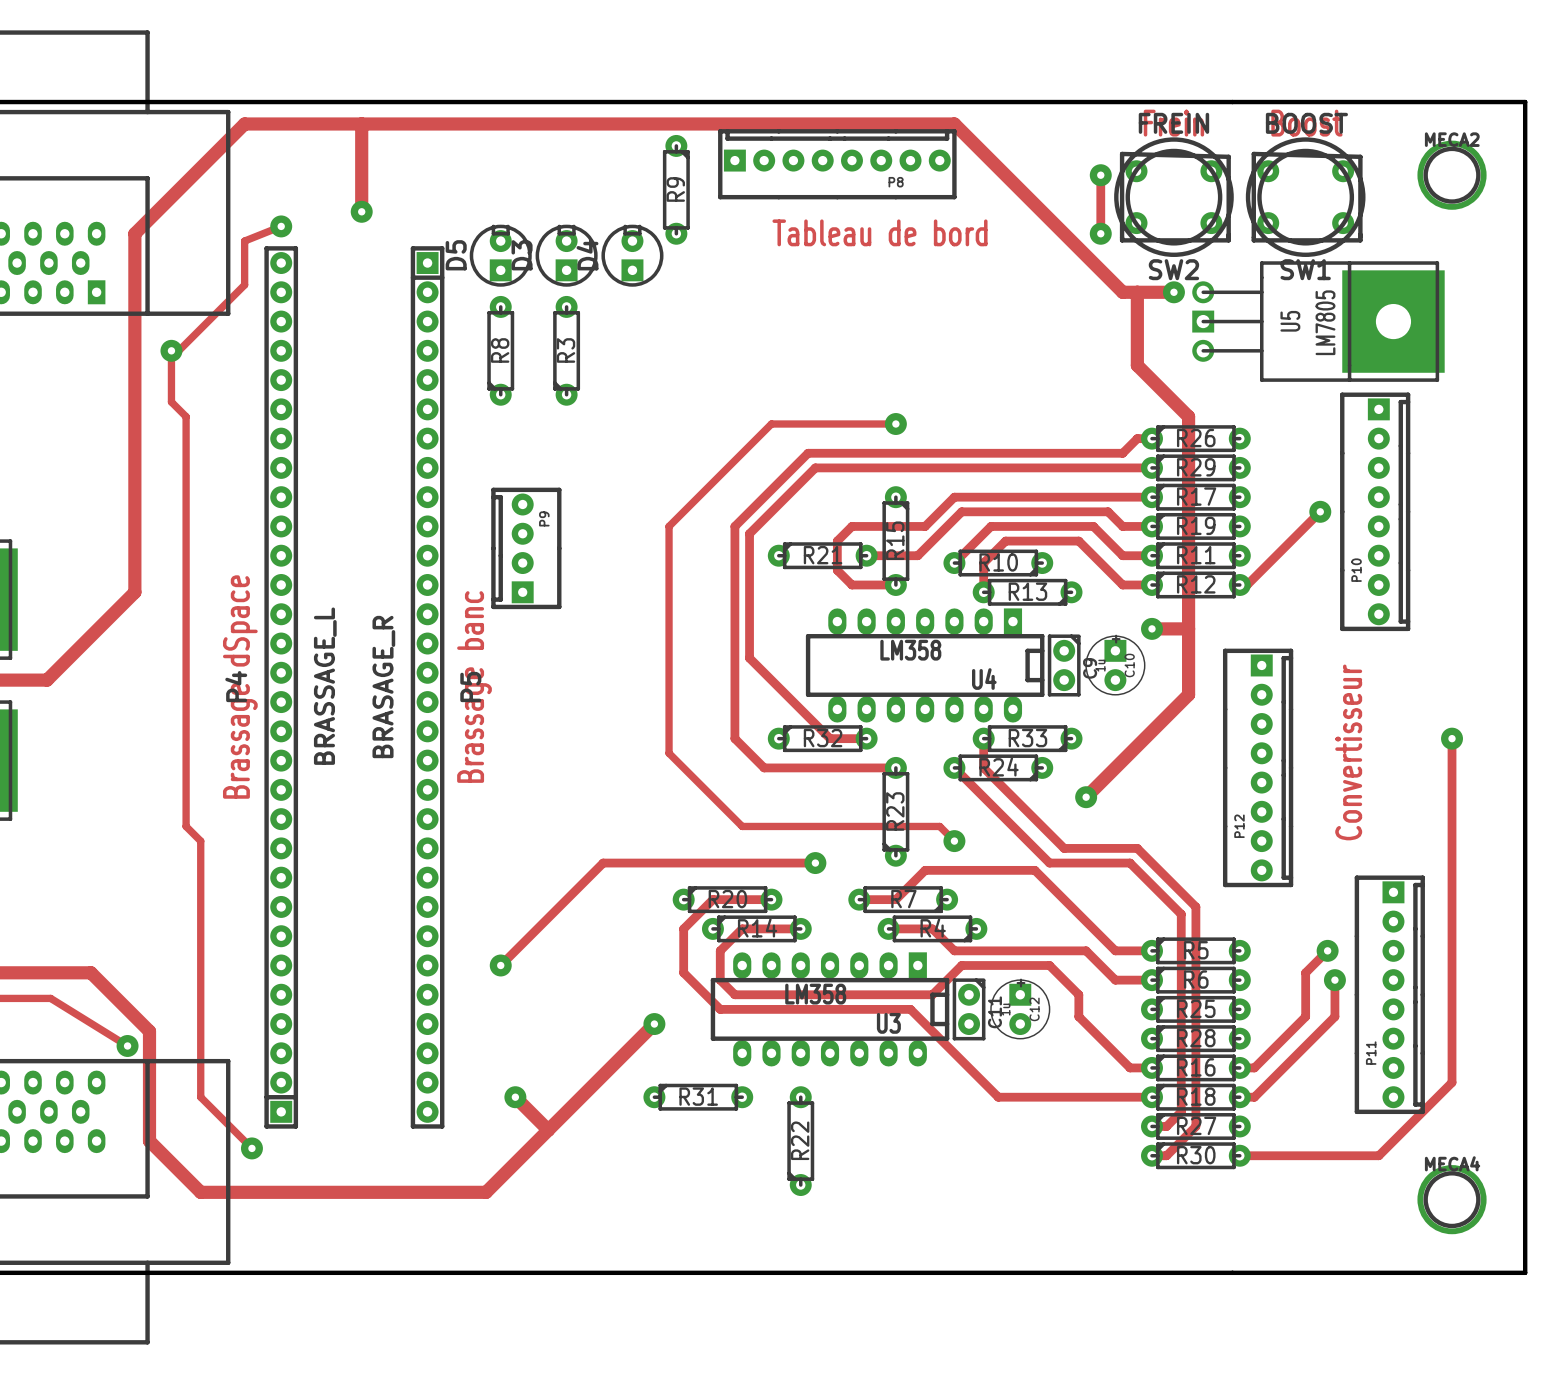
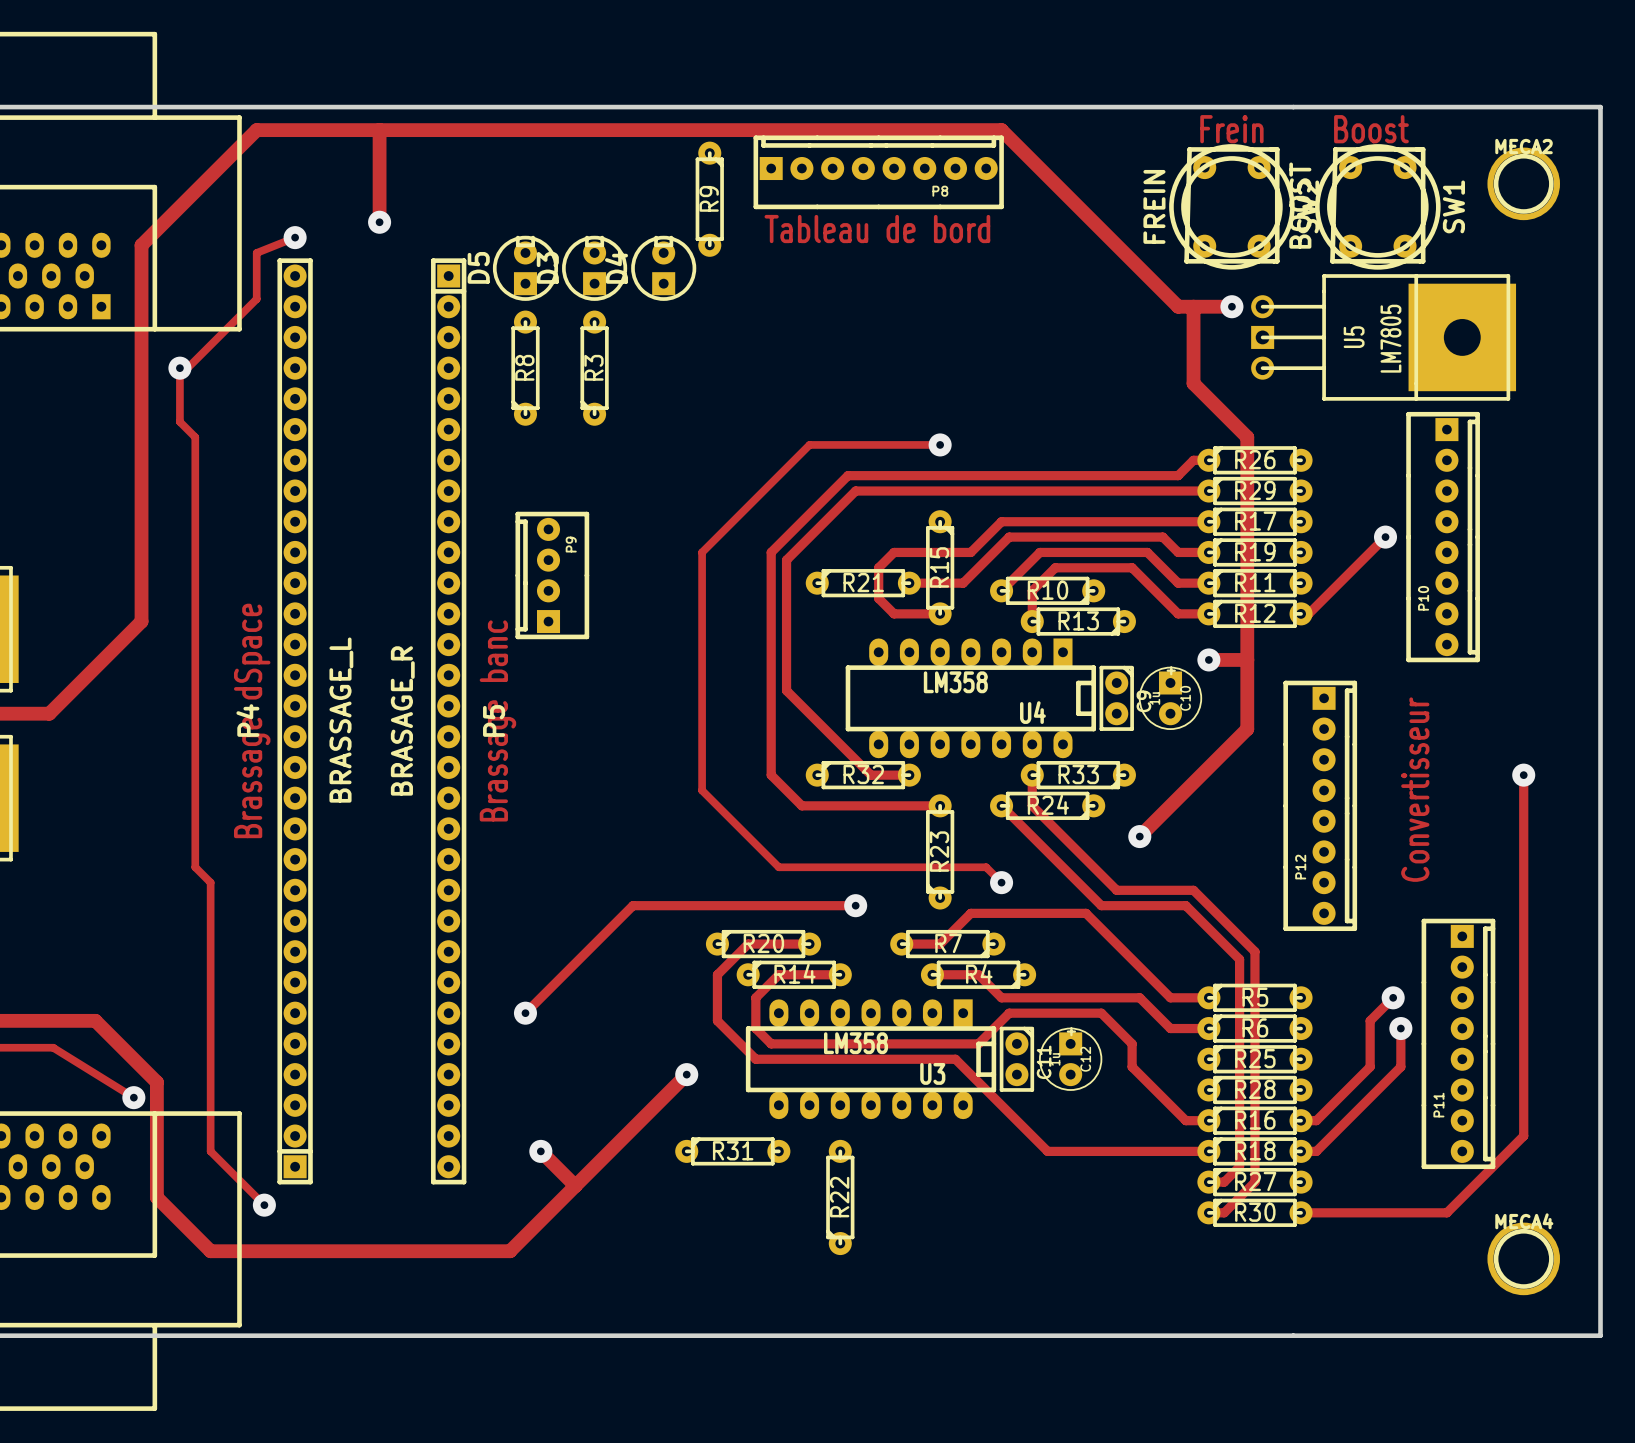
track: (1100, 175) (1100, 233) -> none
via: (1100, 175) -> none
SW2 rotation: 0° (1173, 197) -> 90° counterclockwise (1231, 206)
SW1 rotation: 0° (1305, 197) -> 90° counterclockwise (1377, 206)
text position: Tableau de bord (879, 232) -> Tableau de bord (877, 229)
via: (1100, 233) -> none

